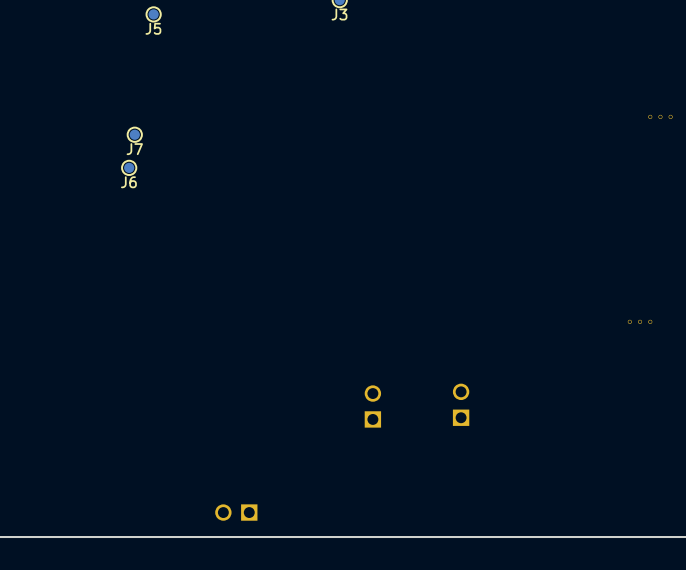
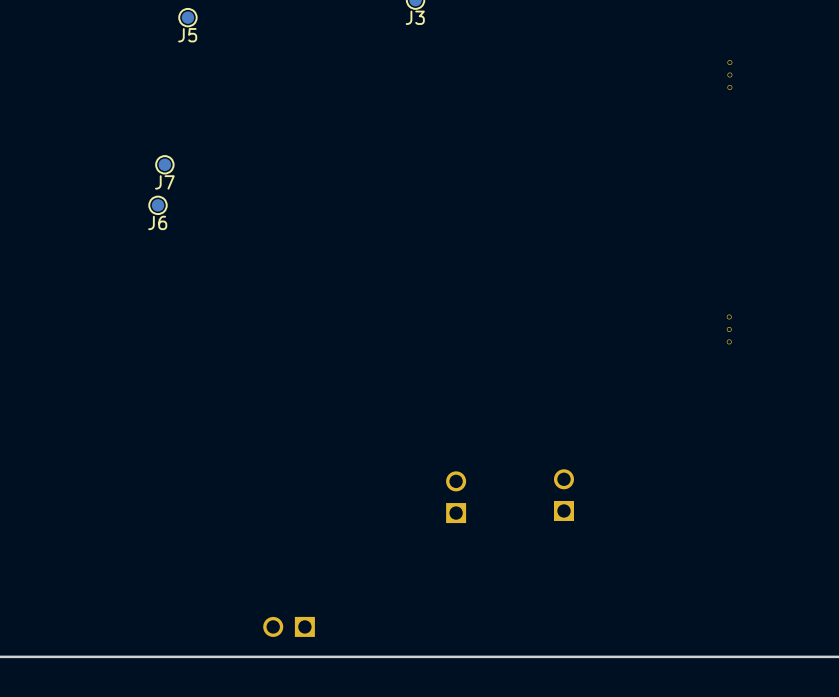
part: none -> (729, 75)
part: (660, 116) -> none
part rotation: 0° (640, 321) -> 90° clockwise (729, 329)
part position: (640, 321) -> (729, 329)

